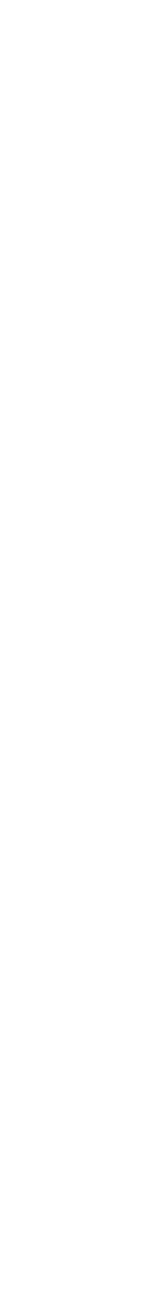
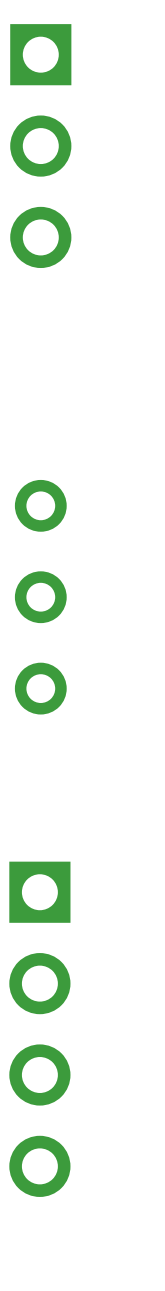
part: none -> (40, 146)
part: none -> (40, 597)
part: none -> (39, 1029)

